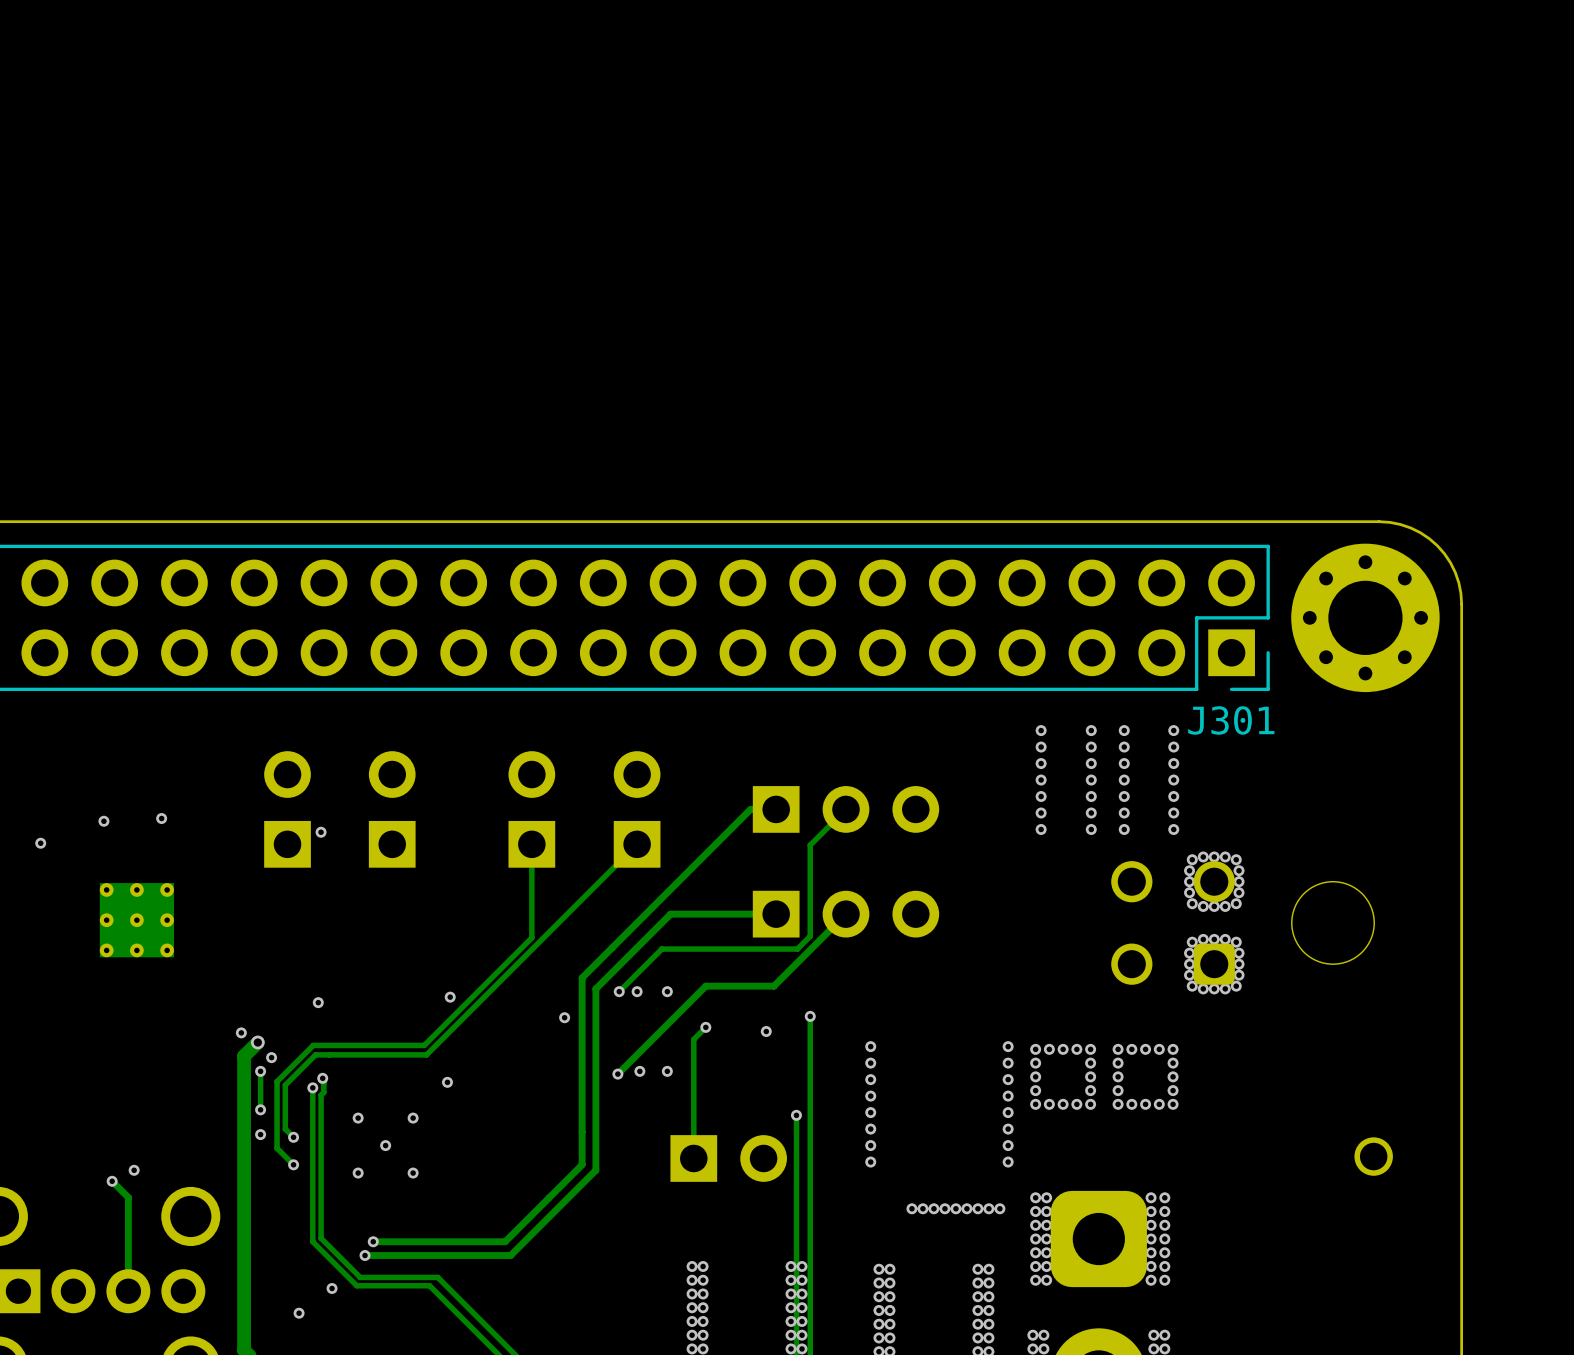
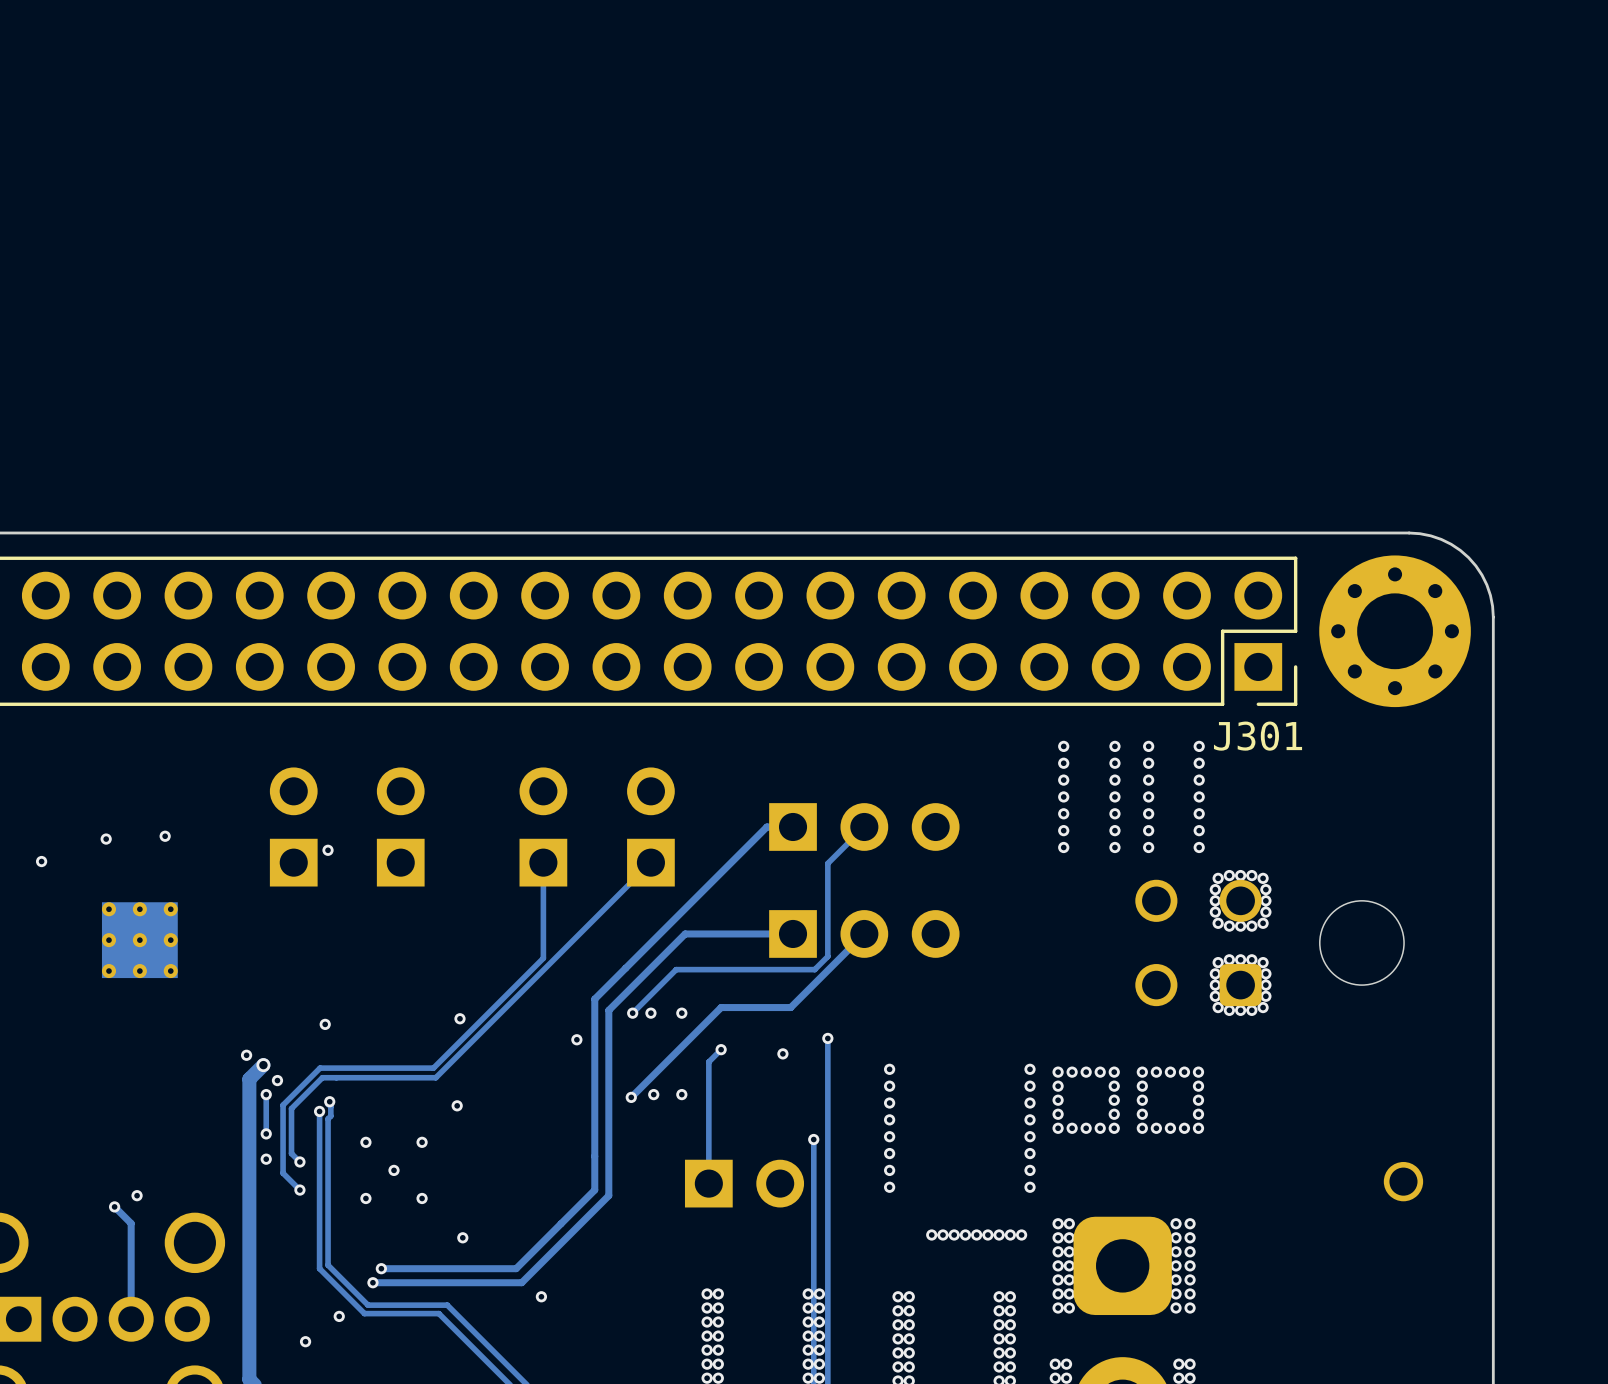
via: none -> (462, 1237)
via: none -> (541, 1296)

